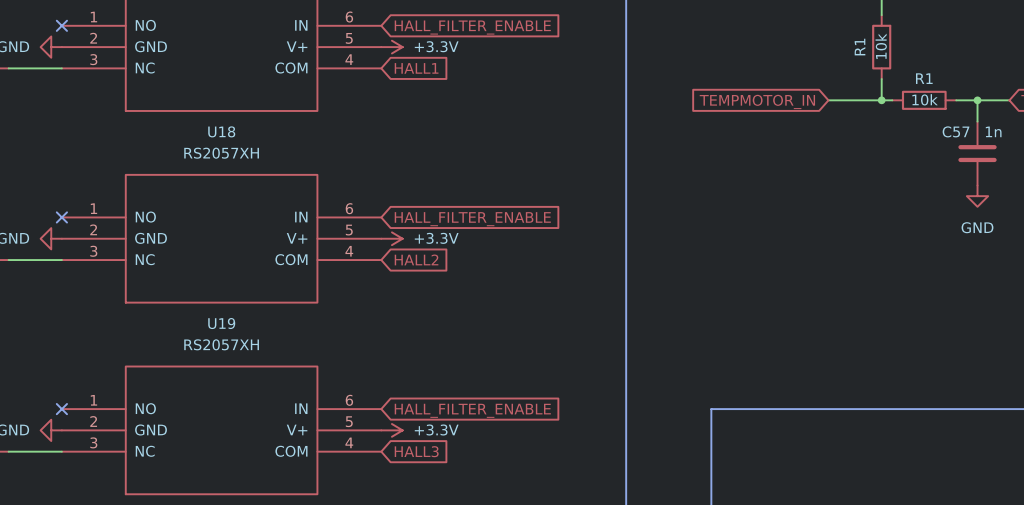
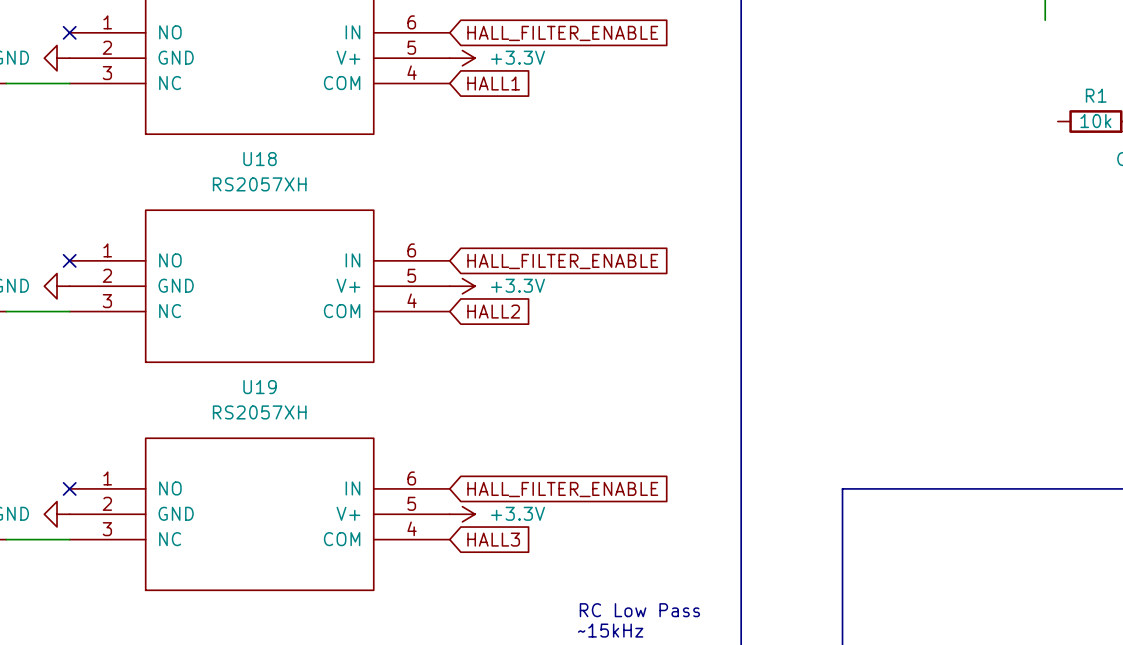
R1: 10k (881, 47) -> none
wire: (881, 79) (881, 100) -> none
wire: (828, 100) (892, 100) -> none
junction: (881, 100) -> none
global label: TEMPMOTOR_IN (757, 101) -> none

